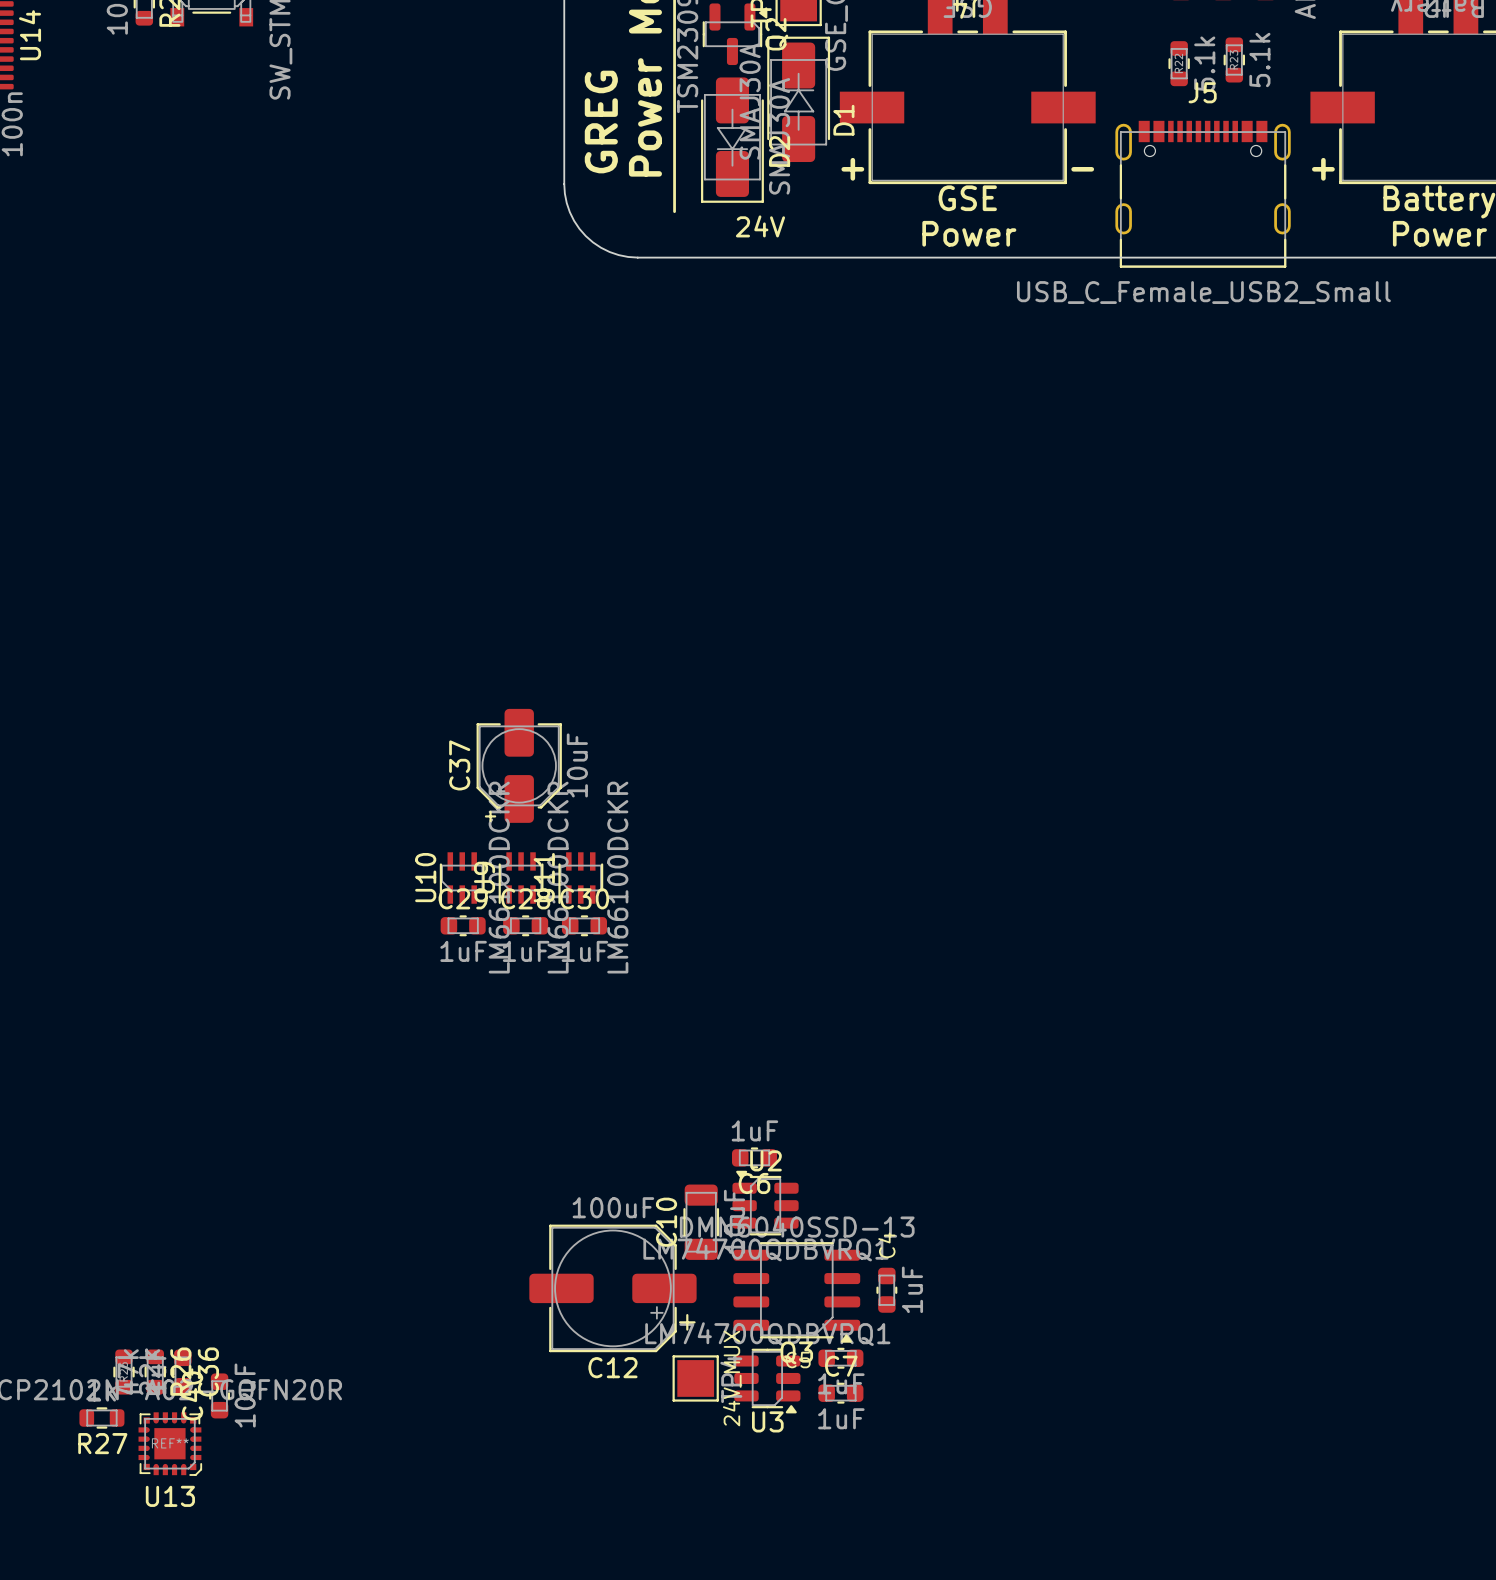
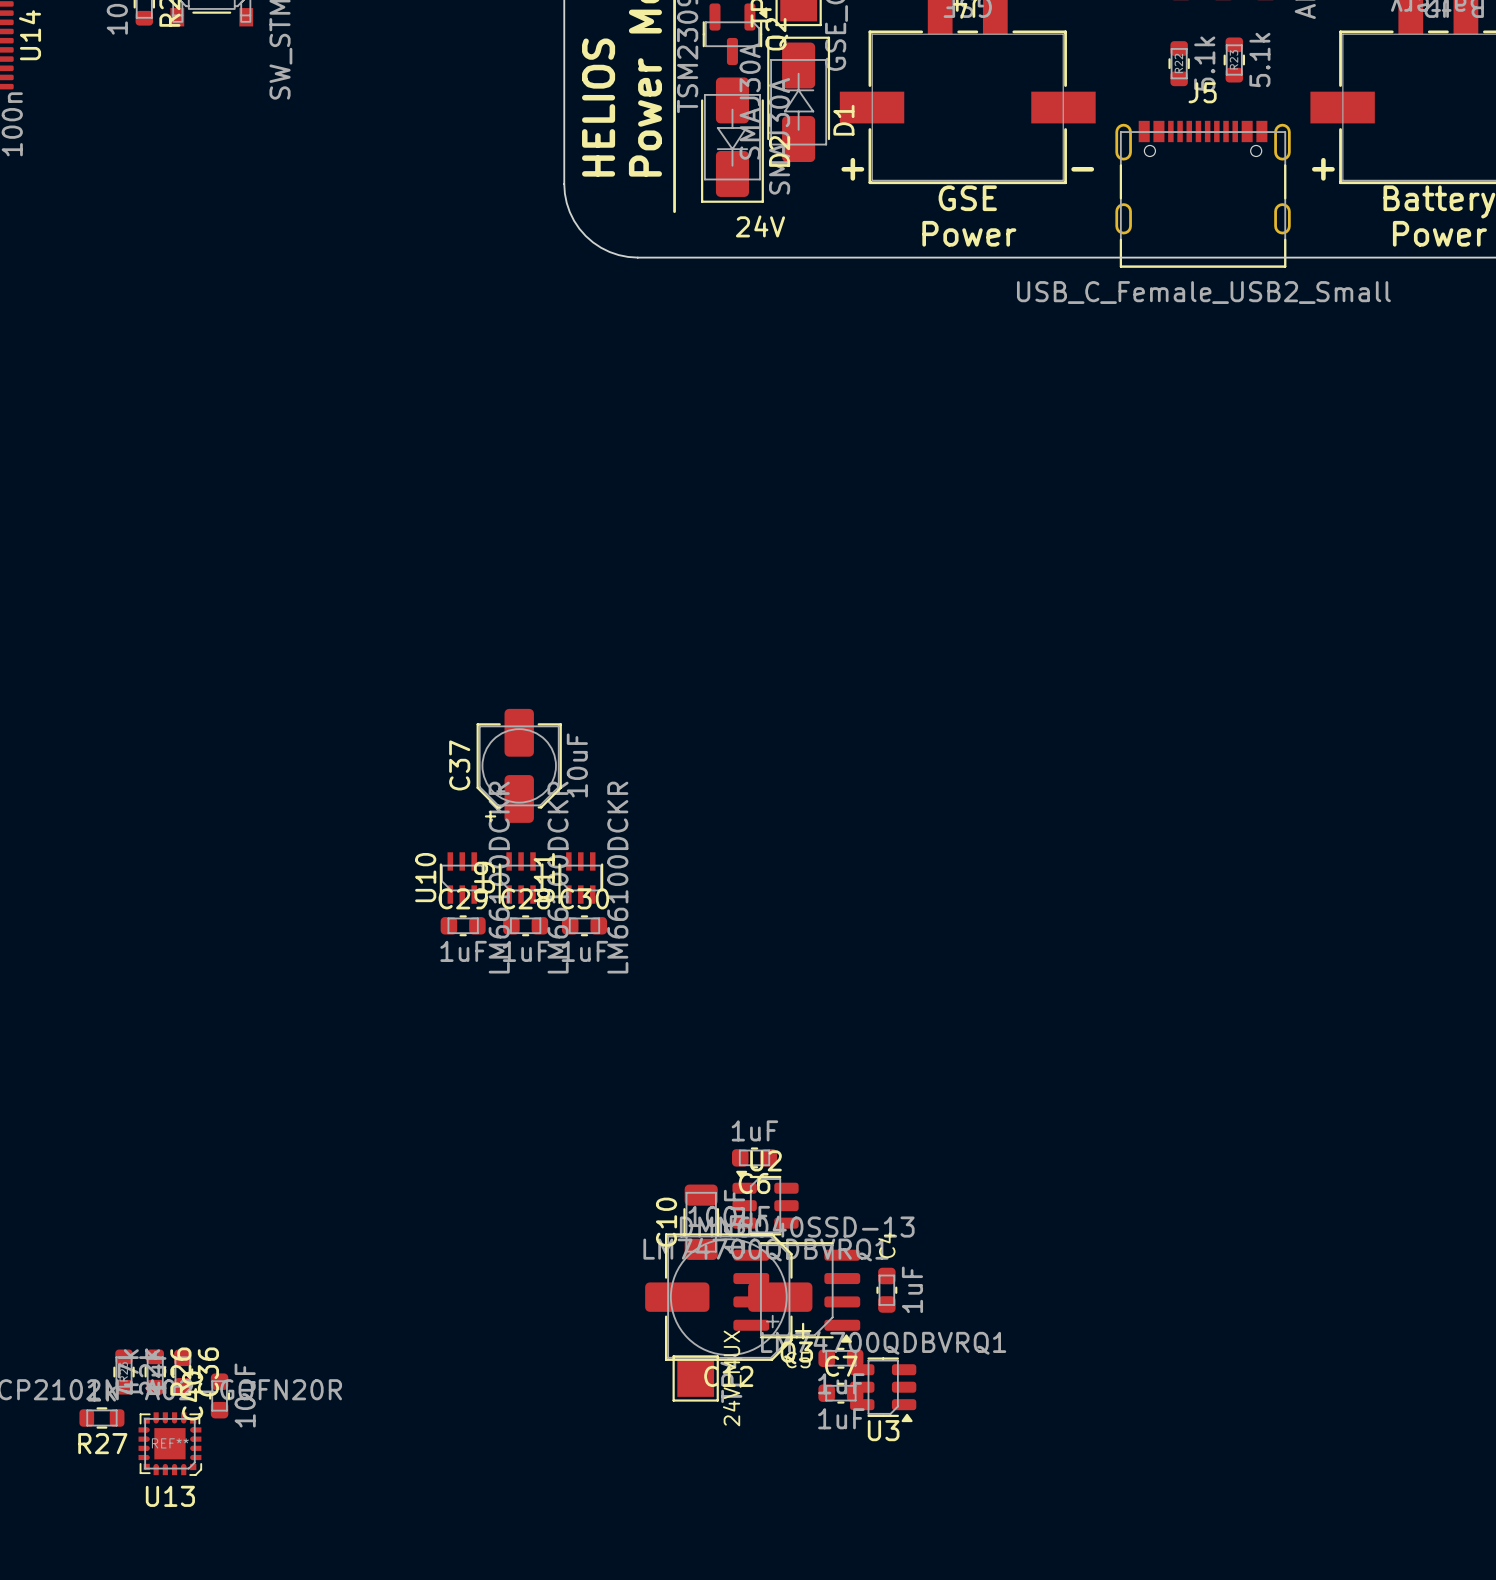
text: GREG (601, 122) -> HELIOS (598, 107)
C12 position: (612, 1288) -> (728, 1297)
U3 position: (767, 1381) -> (883, 1389)

